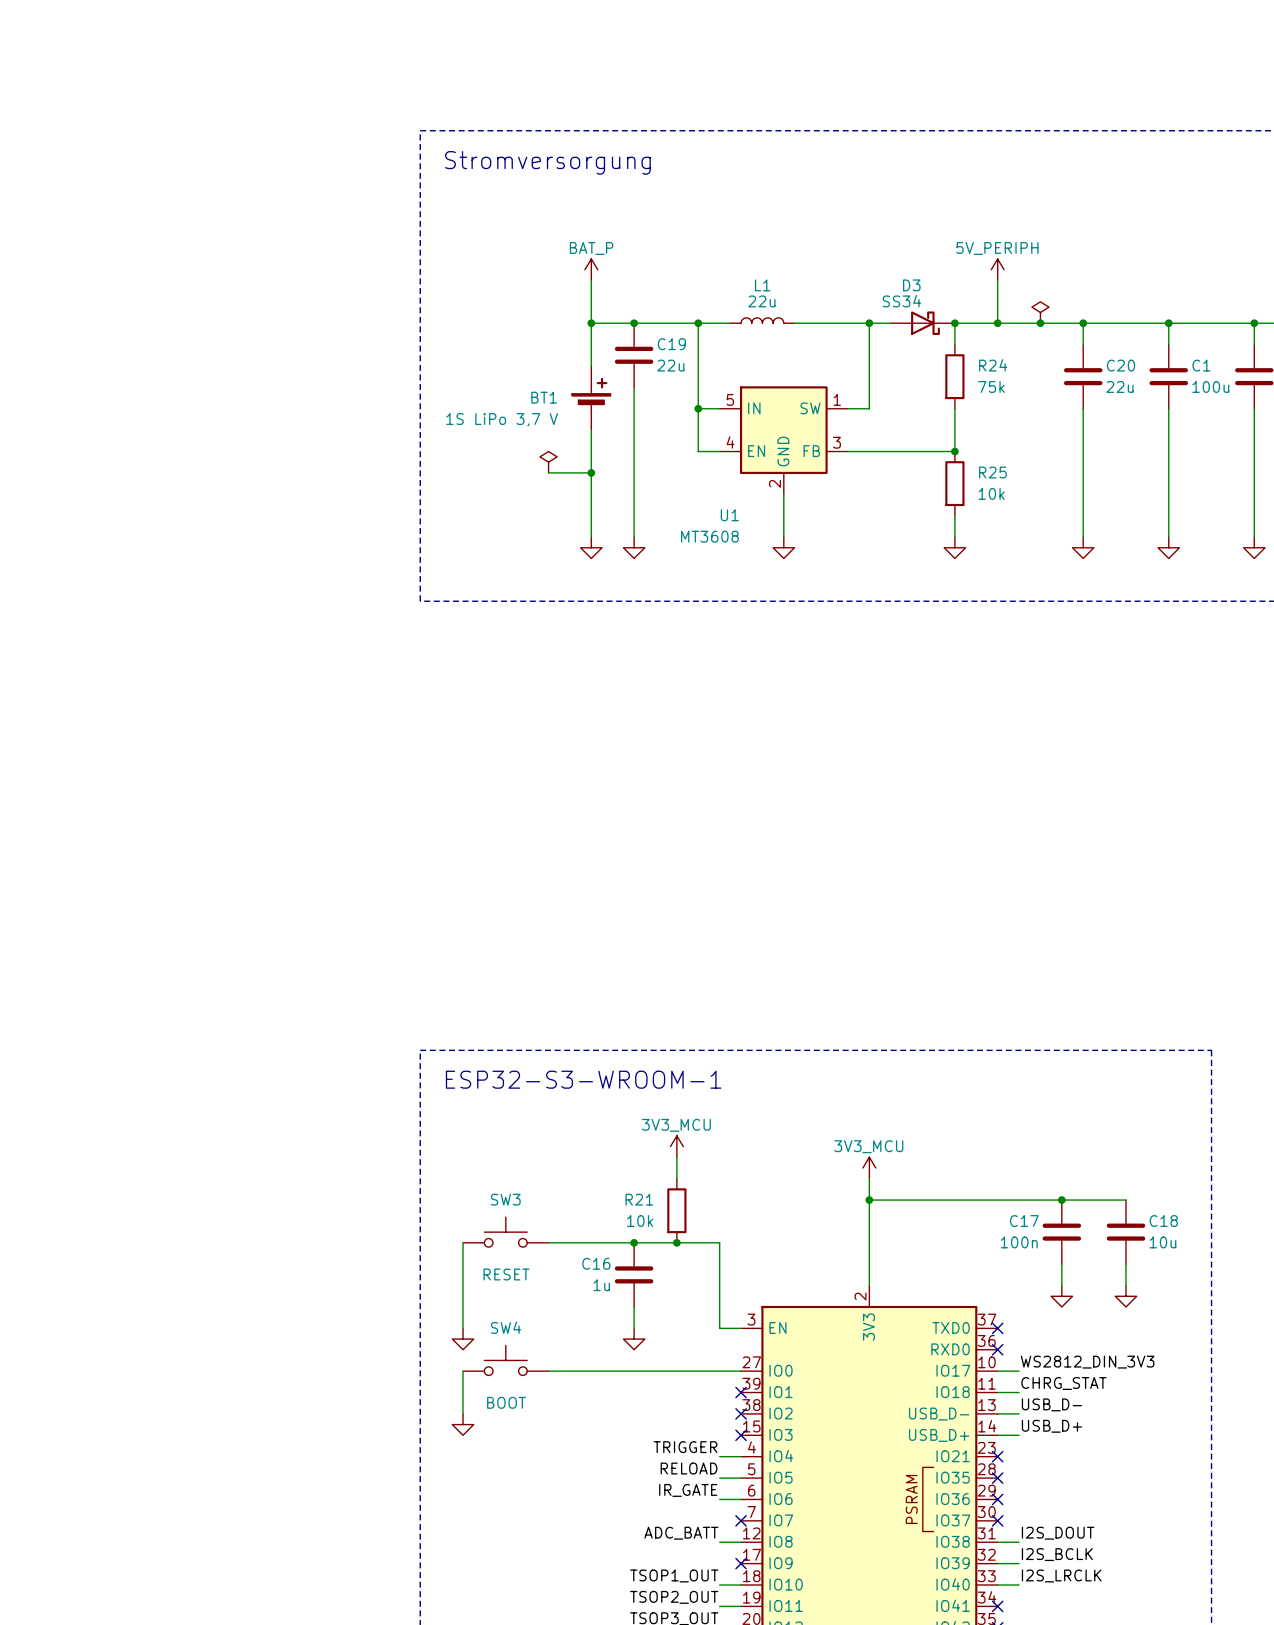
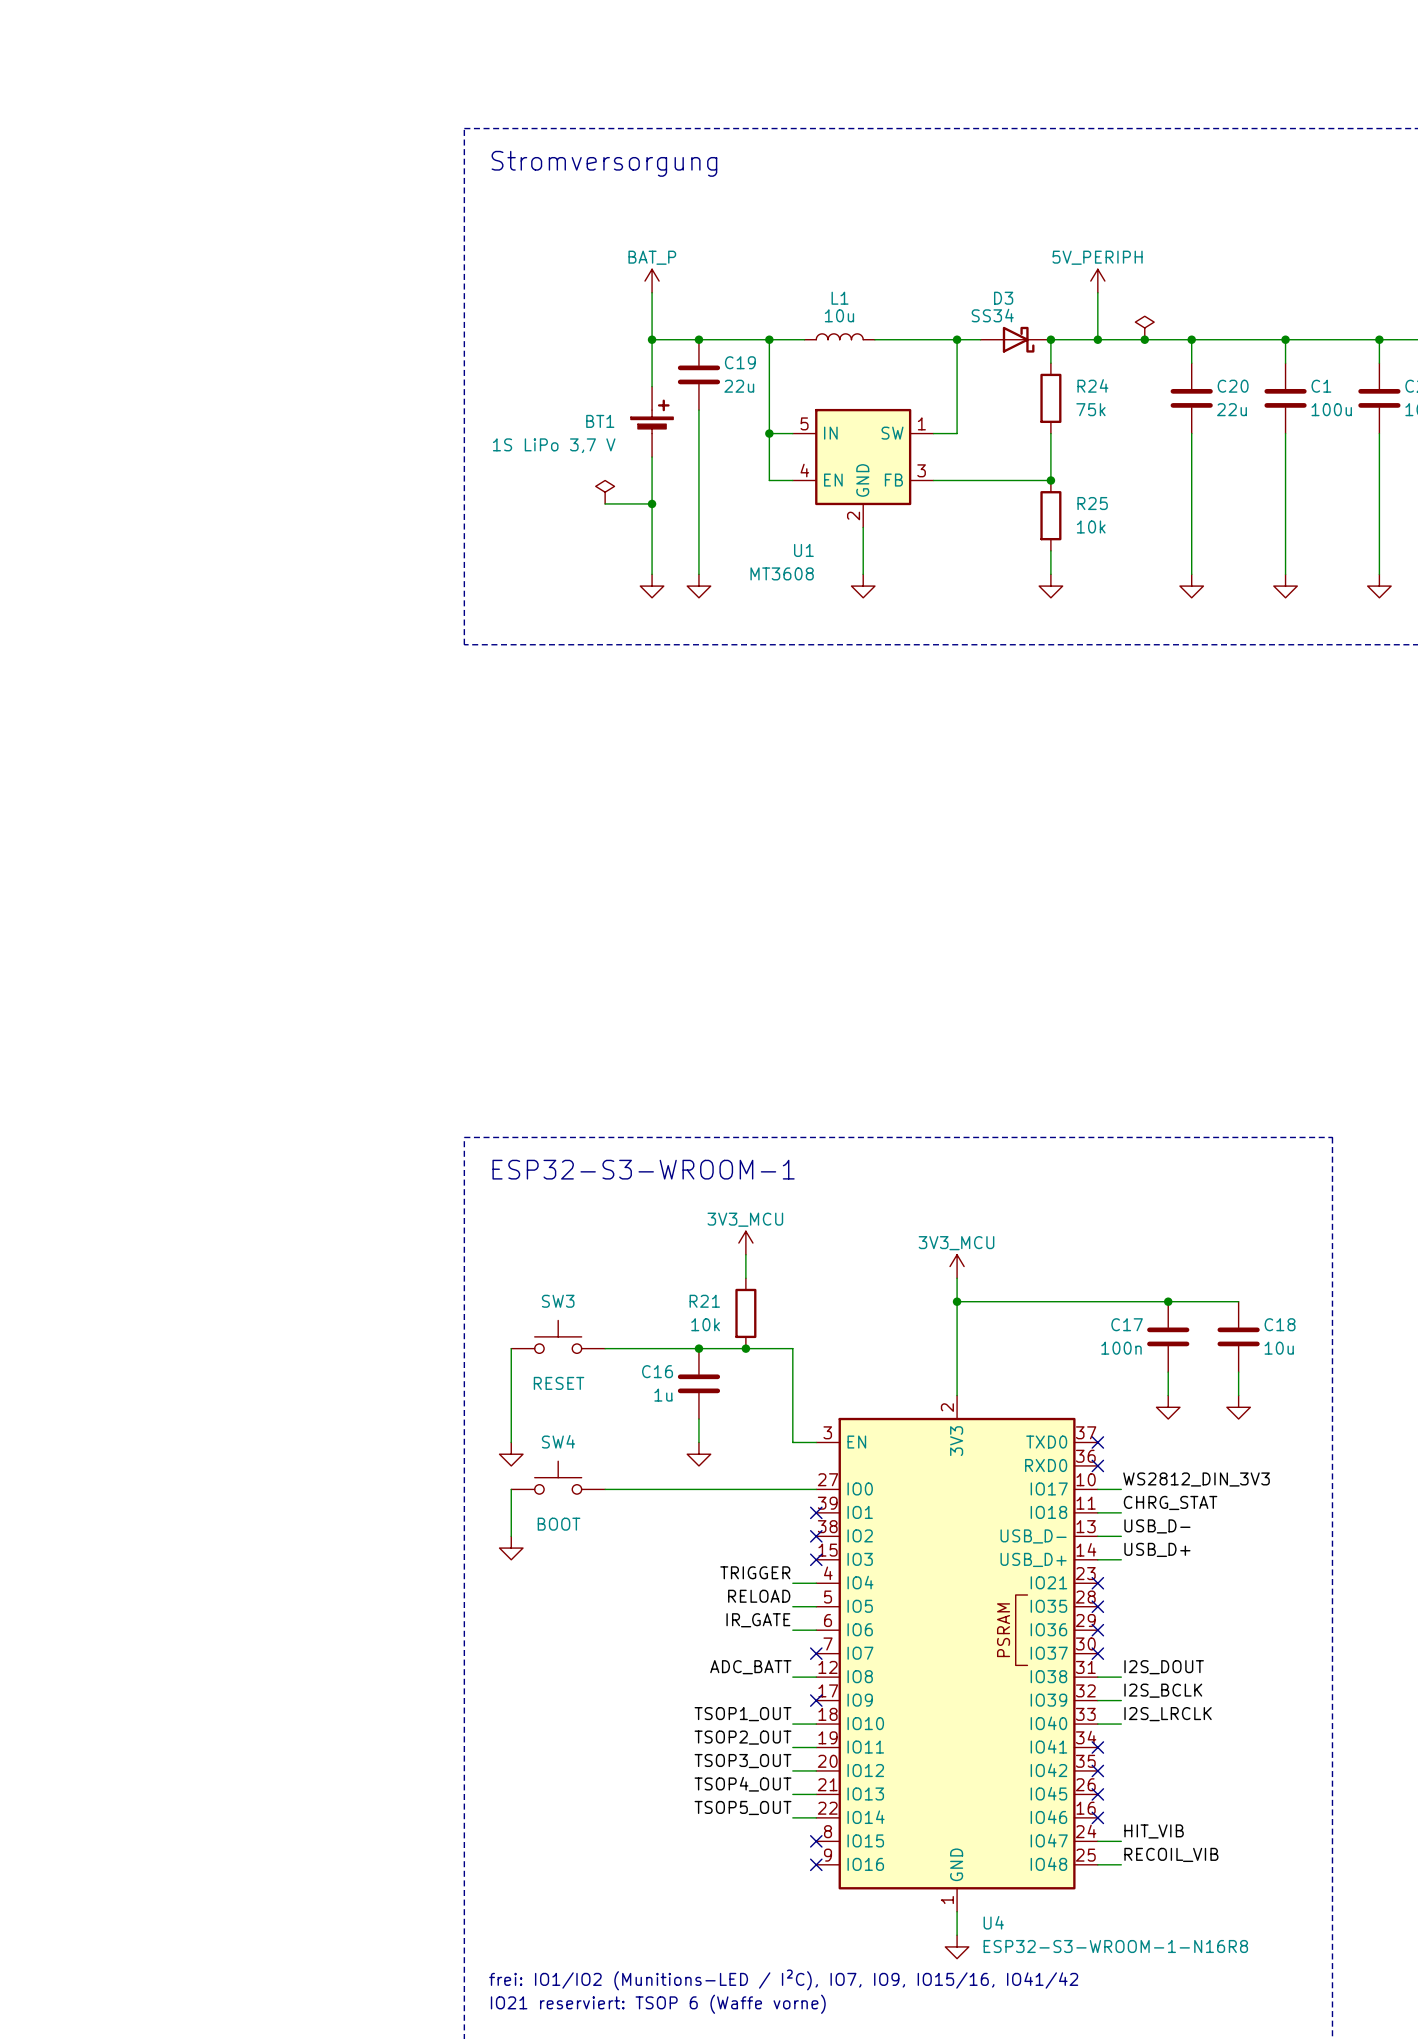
L1 value: 22u (761, 301) -> 10u (839, 315)

